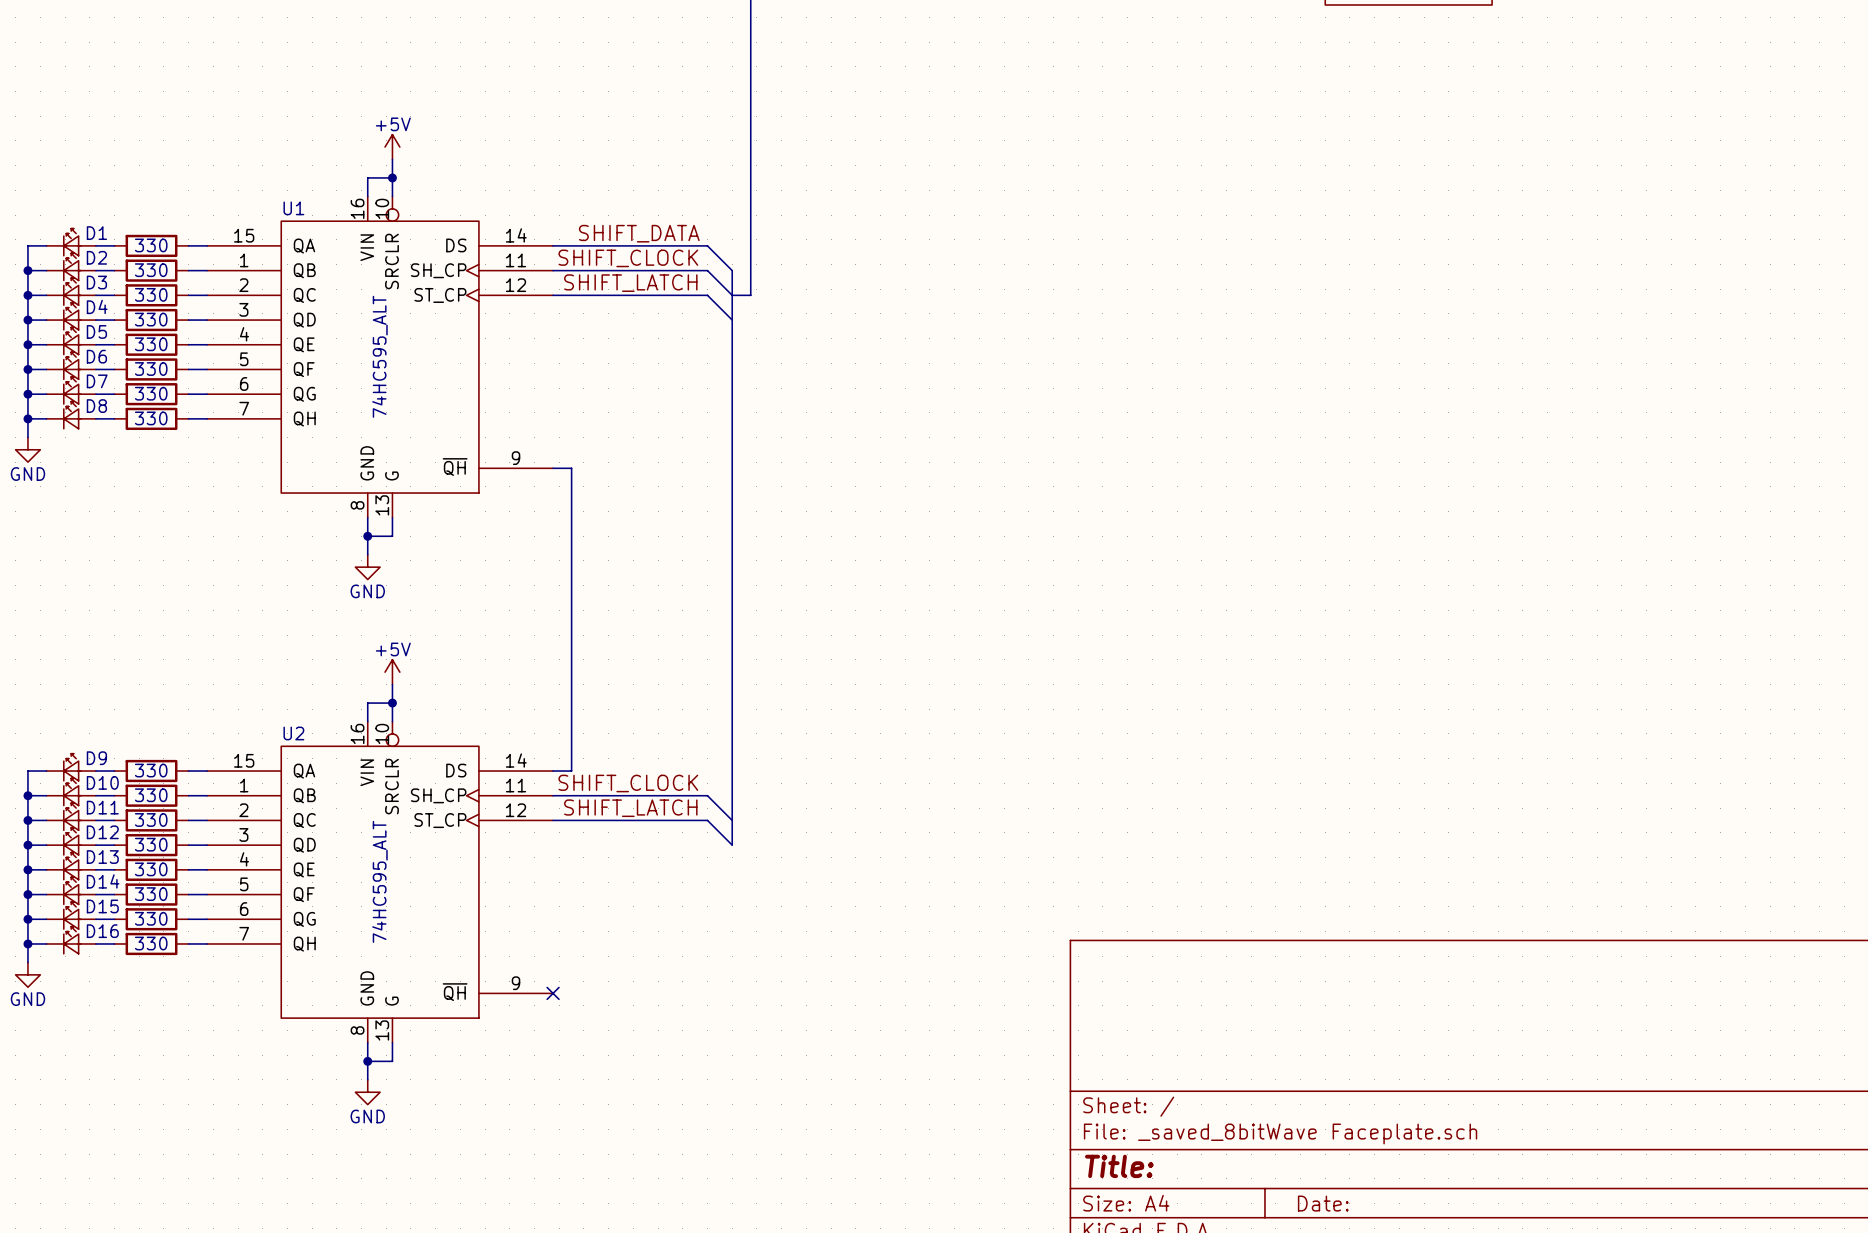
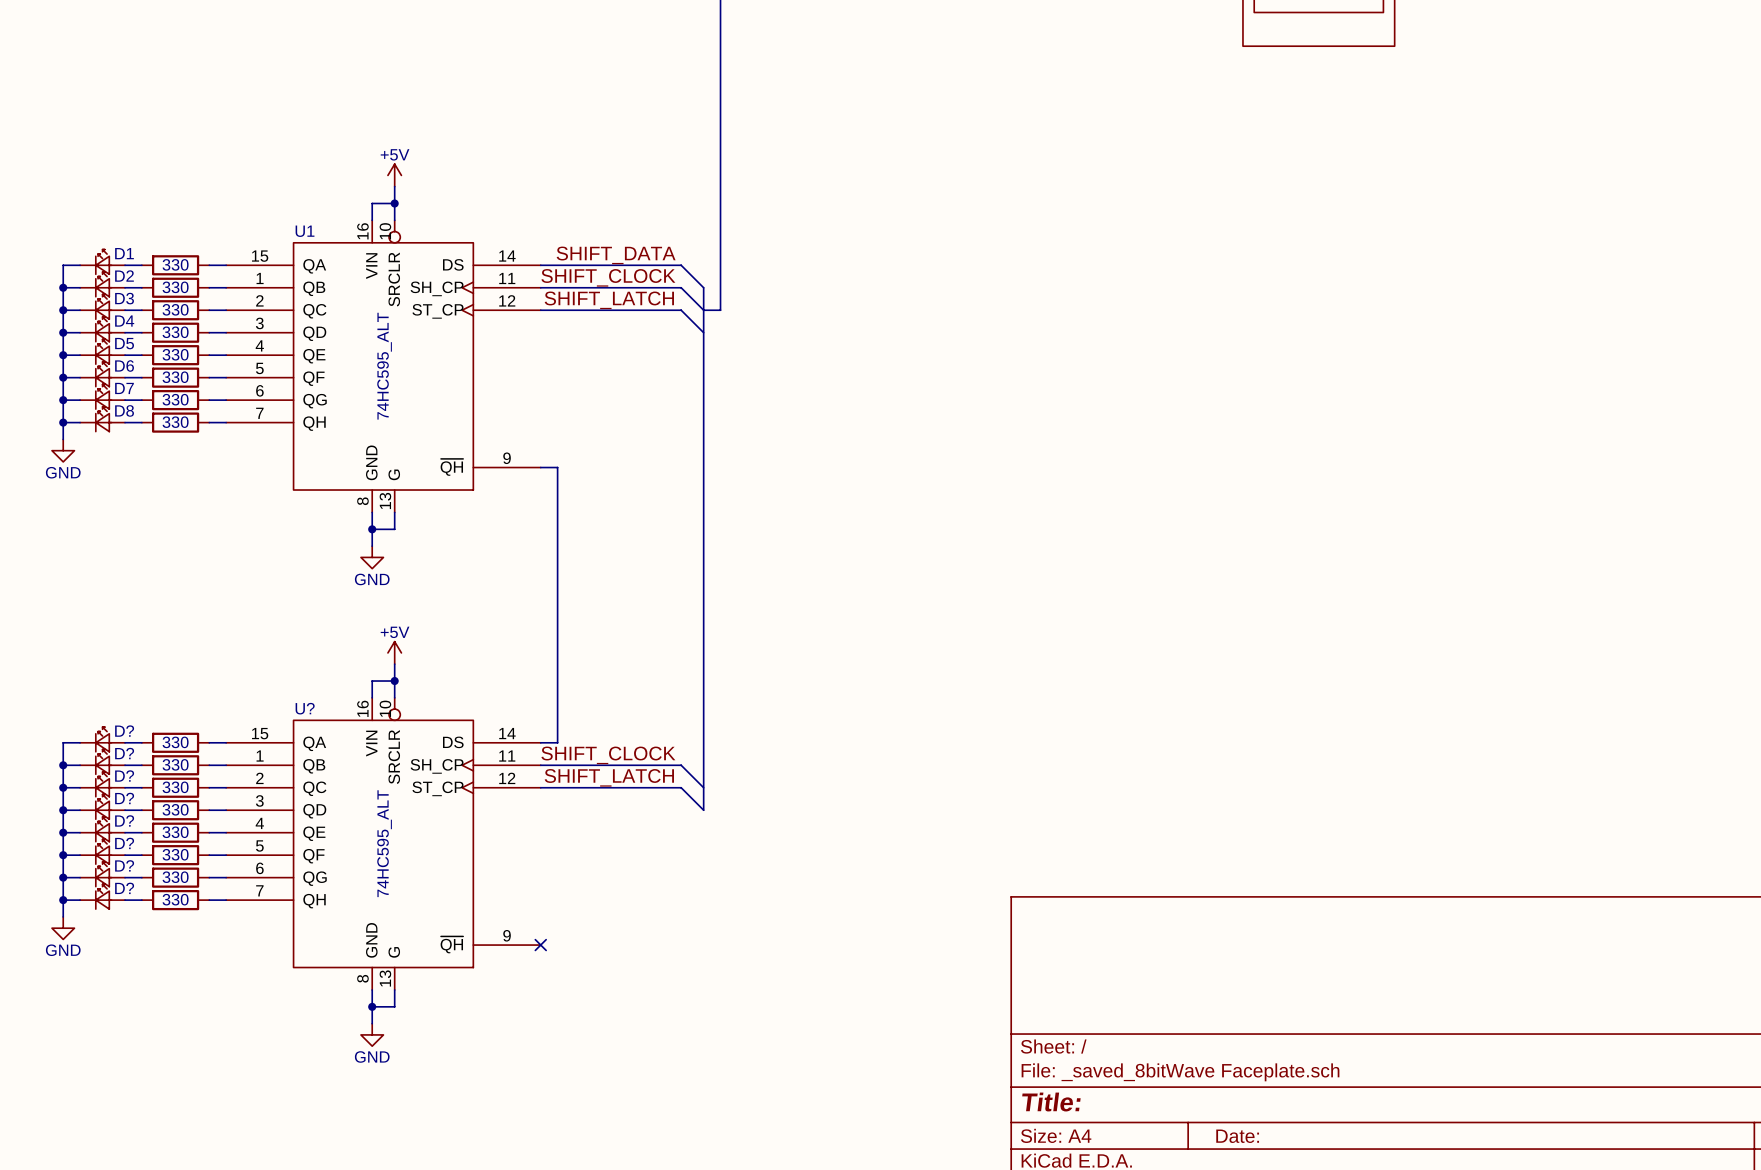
U2 name: U2 (293, 733) -> U? (305, 708)
D9 name: D9 (96, 758) -> D? (124, 731)
D10 name: D10 (102, 782) -> D? (124, 753)
D11 name: D11 (102, 807) -> D? (124, 776)
D12 name: D12 (102, 832) -> D? (124, 798)
D13 name: D13 (102, 857) -> D? (124, 820)
D14 name: D14 (103, 881) -> D? (124, 843)
D15 name: D15 (102, 906) -> D? (124, 865)
D16 name: D16 (102, 931) -> D? (124, 888)

